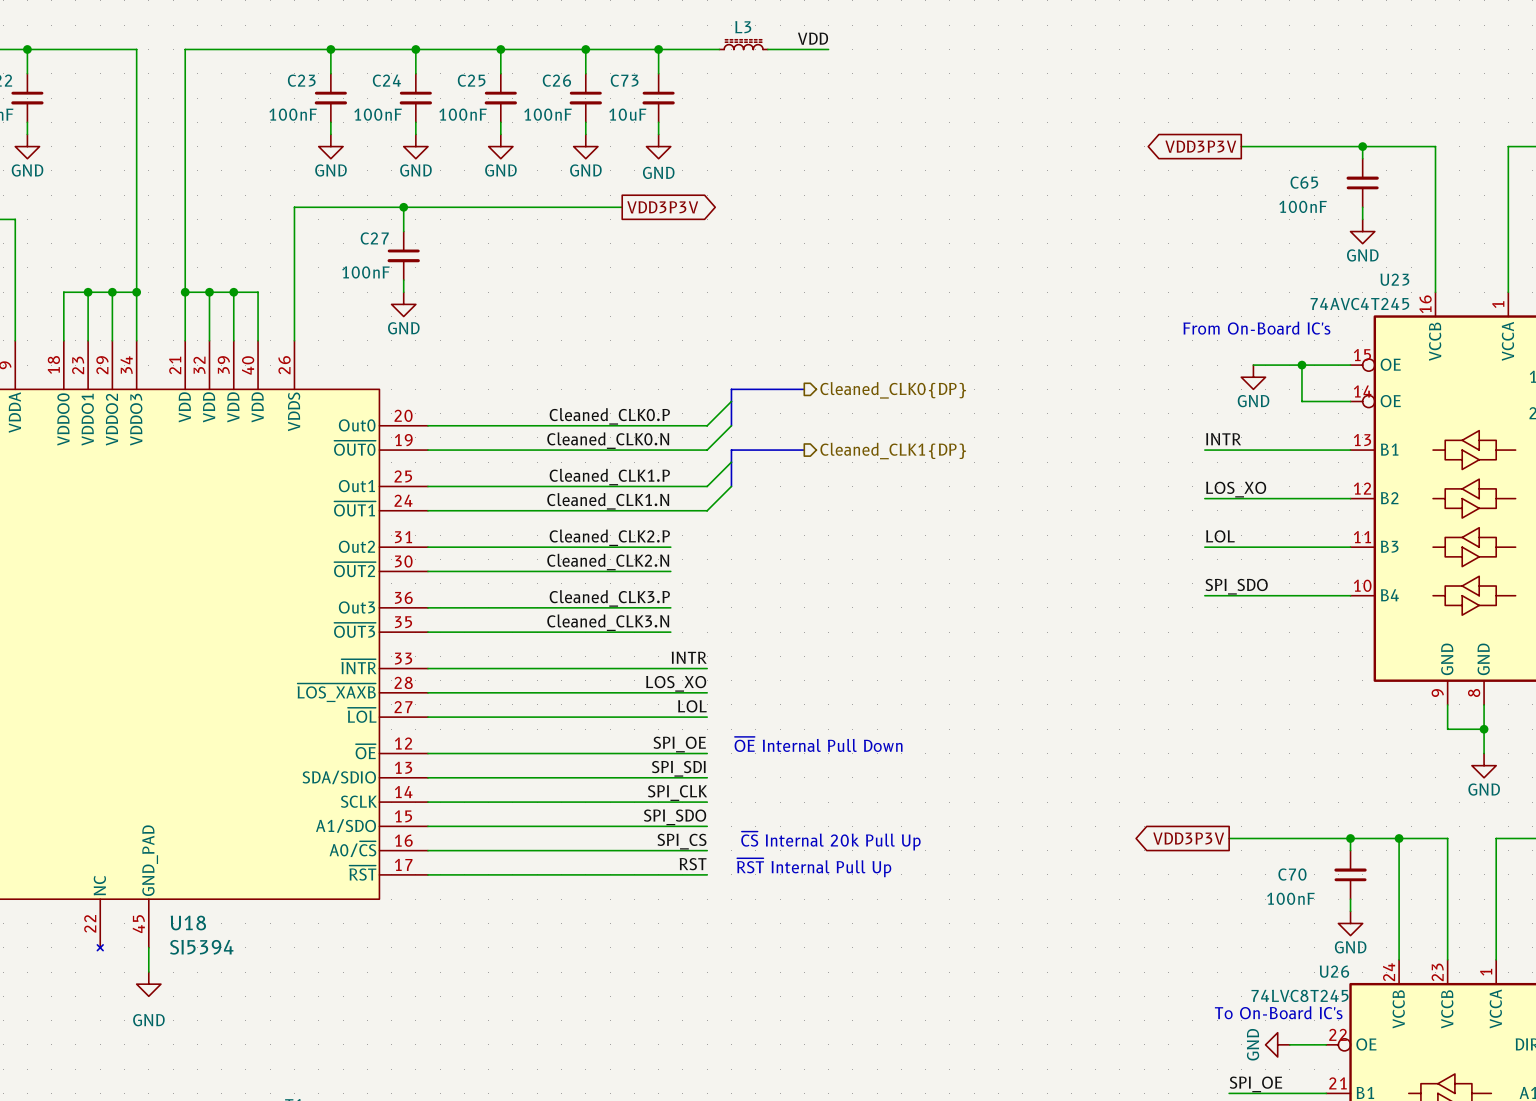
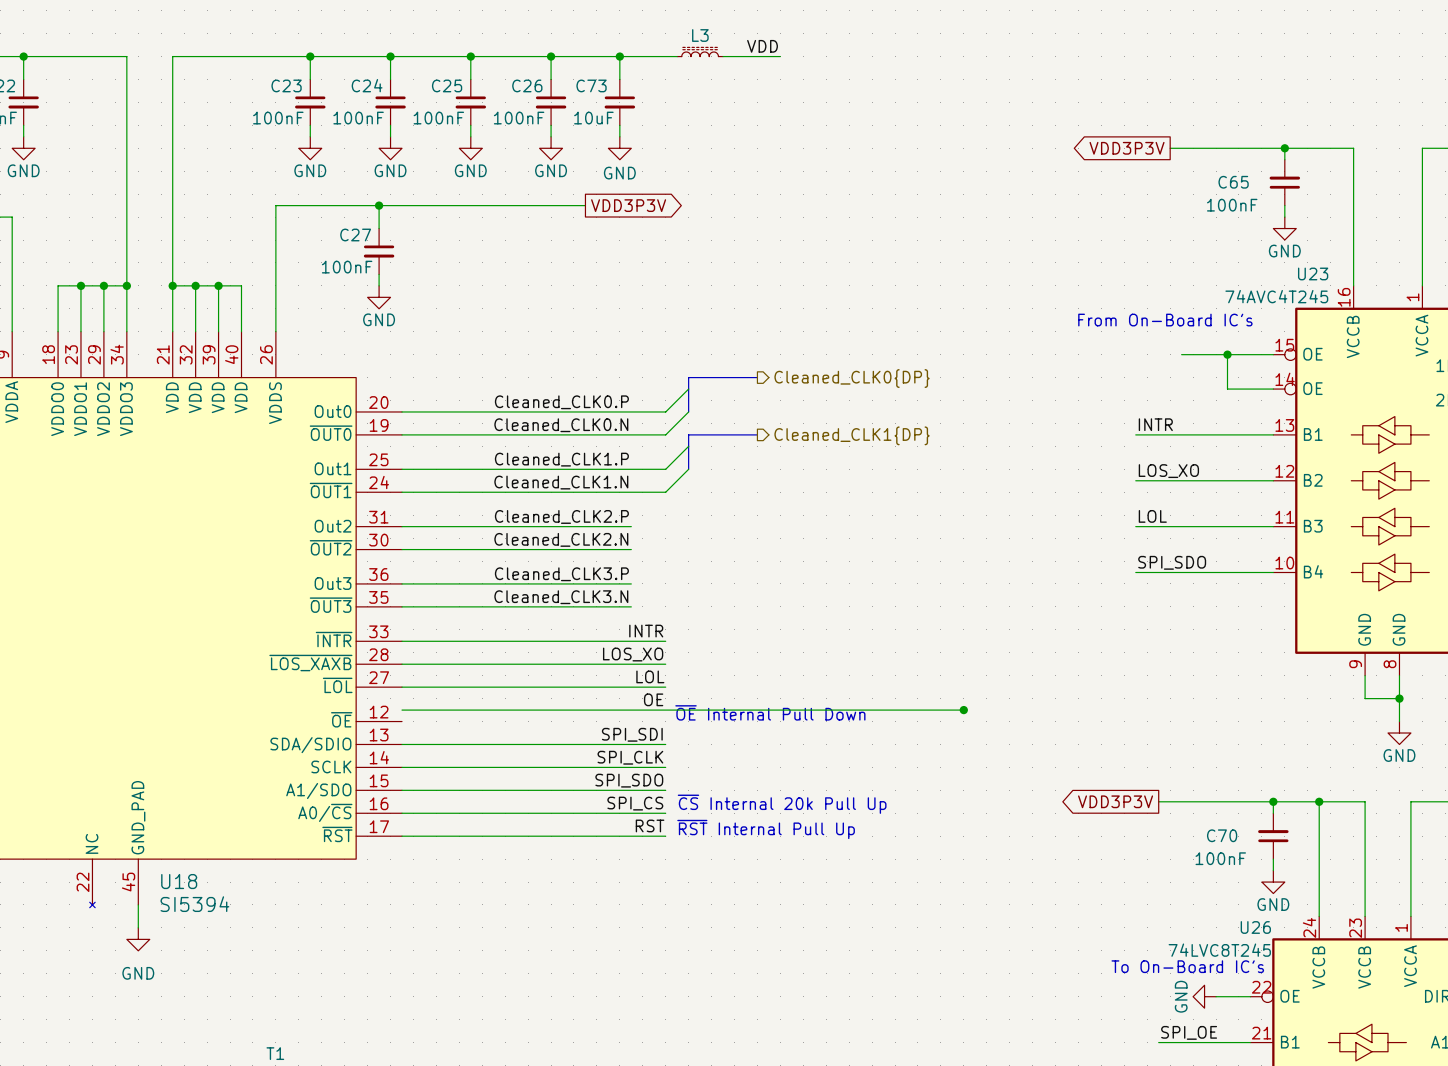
power symbol: GND (1253, 377) -> none
label: none -> OE (653, 699)
wire: none -> (402, 710) (963, 710)
junction: none -> (963, 710)
label: SPI_OE (679, 744) -> none
wire: (427, 753) (707, 753) -> none

